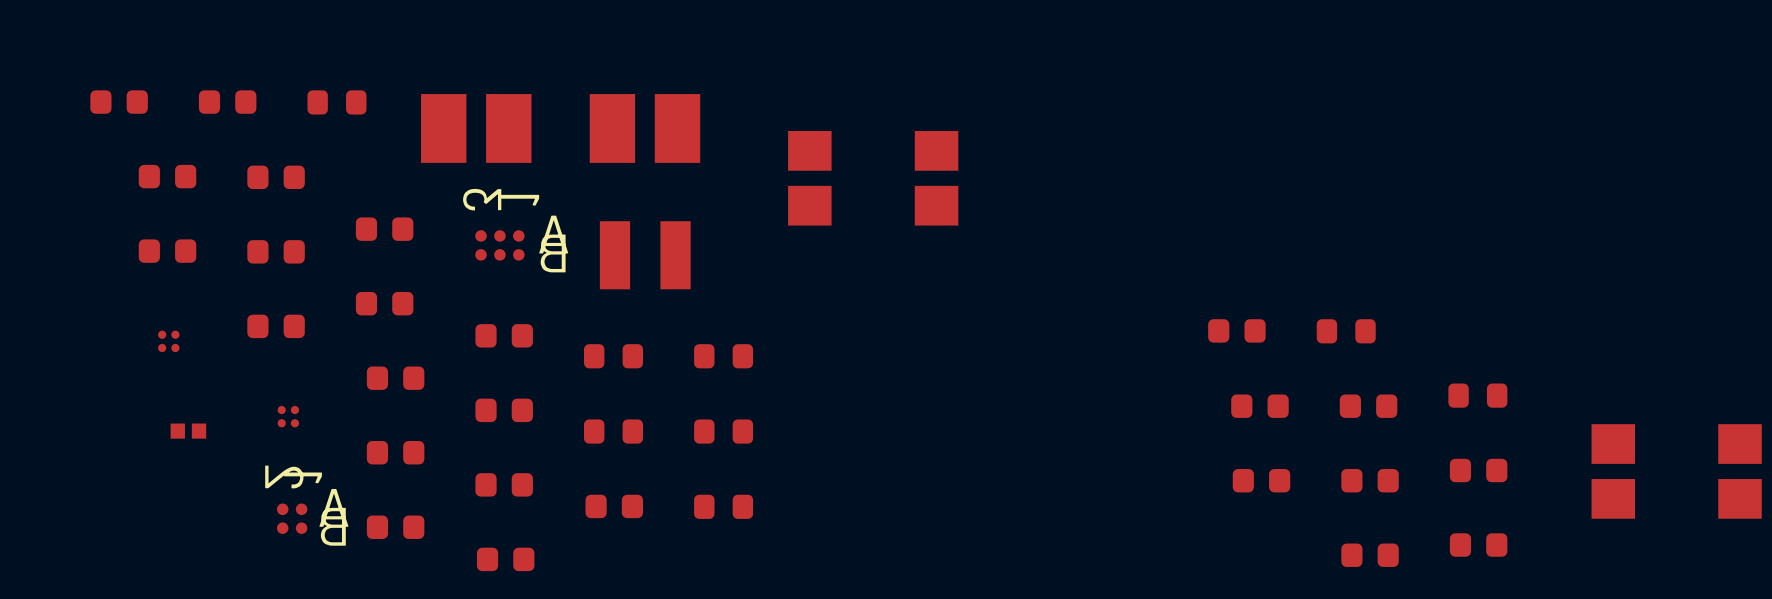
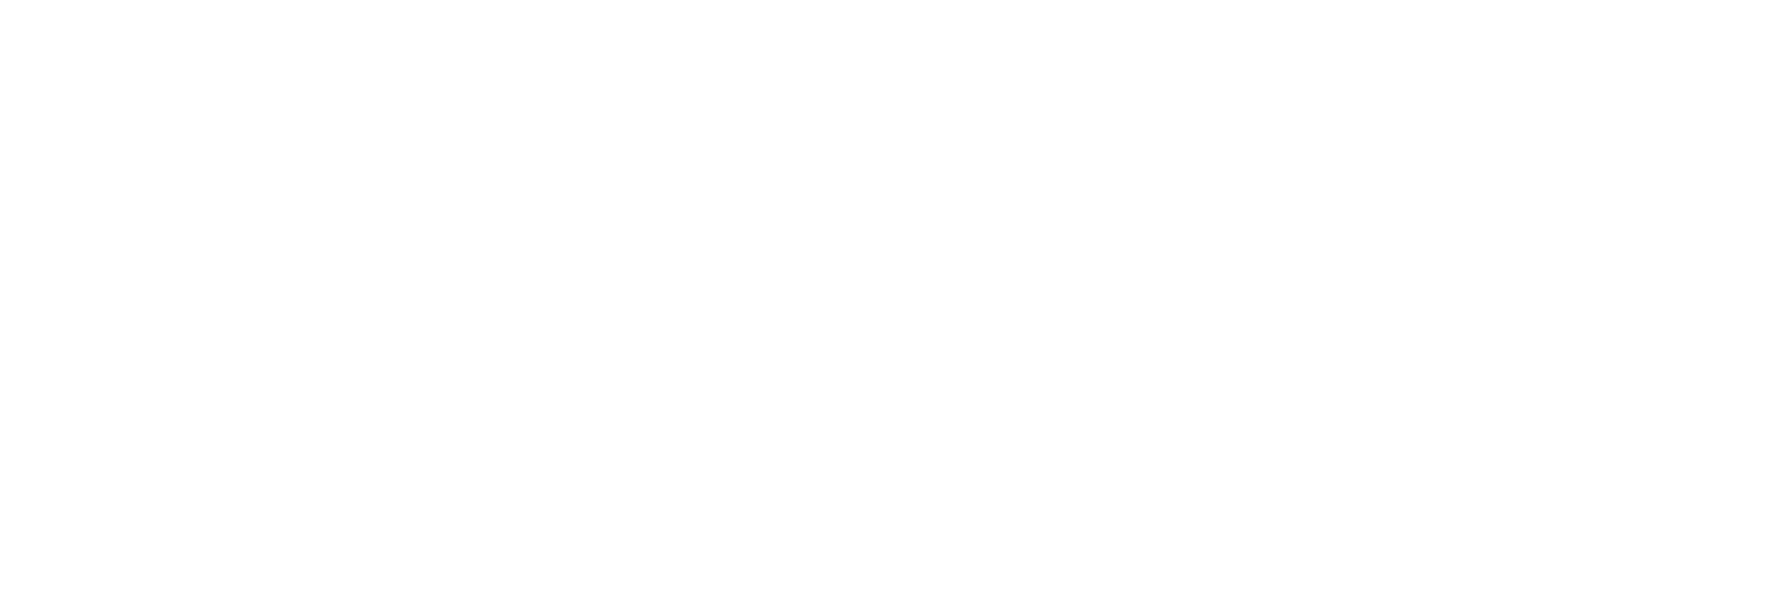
part: (119, 102) -> none
part: (227, 102) -> none
part: (336, 102) -> none
part: (476, 128) -> none
part: (644, 128) -> none
part: (167, 176) -> none
part: (276, 177) -> none
part: (873, 178) -> none
part: (384, 229) -> none
part: (499, 245) -> none
part: (167, 251) -> none
part: (276, 251) -> none
part: (645, 255) -> none
part: (384, 303) -> none
part: (276, 326) -> none
part: (1236, 330) -> none
part: (1346, 331) -> none
part: (504, 335) -> none
part: (168, 341) -> none
part: (613, 356) -> none
part: (723, 356) -> none
part: (395, 378) -> none
part: (1477, 395) -> none
part: (1259, 406) -> none
part: (1368, 406) -> none
part: (504, 410) -> none
part: (288, 416) -> none
part: (188, 431) -> none
part: (613, 431) -> none
part: (723, 431) -> none
part: (395, 452) -> none
part: (1478, 470) -> none
part: (1676, 471) -> none
part: (1261, 480) -> none
part: (1370, 480) -> none
part: (504, 484) -> none
part: (614, 506) -> none
part: (723, 506) -> none
part: (292, 518) -> none
part: (395, 527) -> none
part: (1478, 545) -> none
part: (1370, 555) -> none
part: (505, 559) -> none

